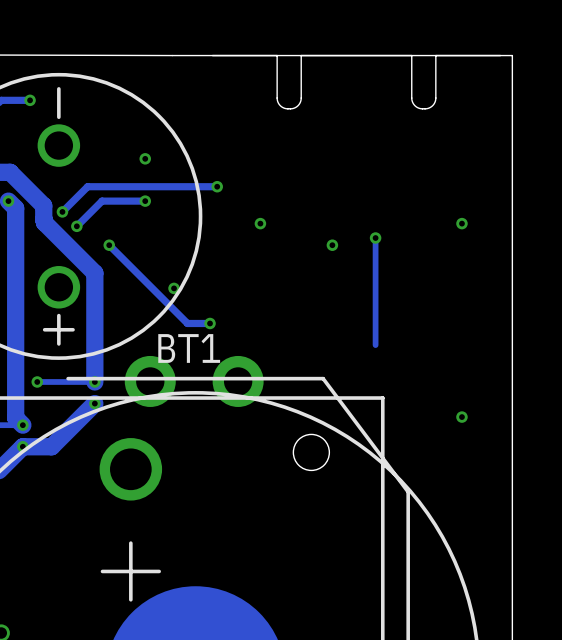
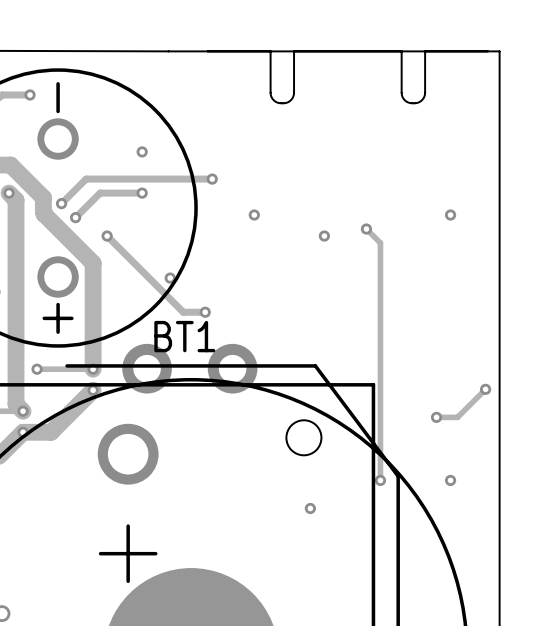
track: (375, 238) (375, 345) -> (366, 229) (380, 243) (380, 480)
track: none -> (485, 389) (457, 417) (436, 417)
via: none -> (485, 389)
via: (461, 417) -> none
via: none -> (436, 417)
via: none -> (380, 480)
via: none -> (450, 480)
via: none -> (310, 508)

